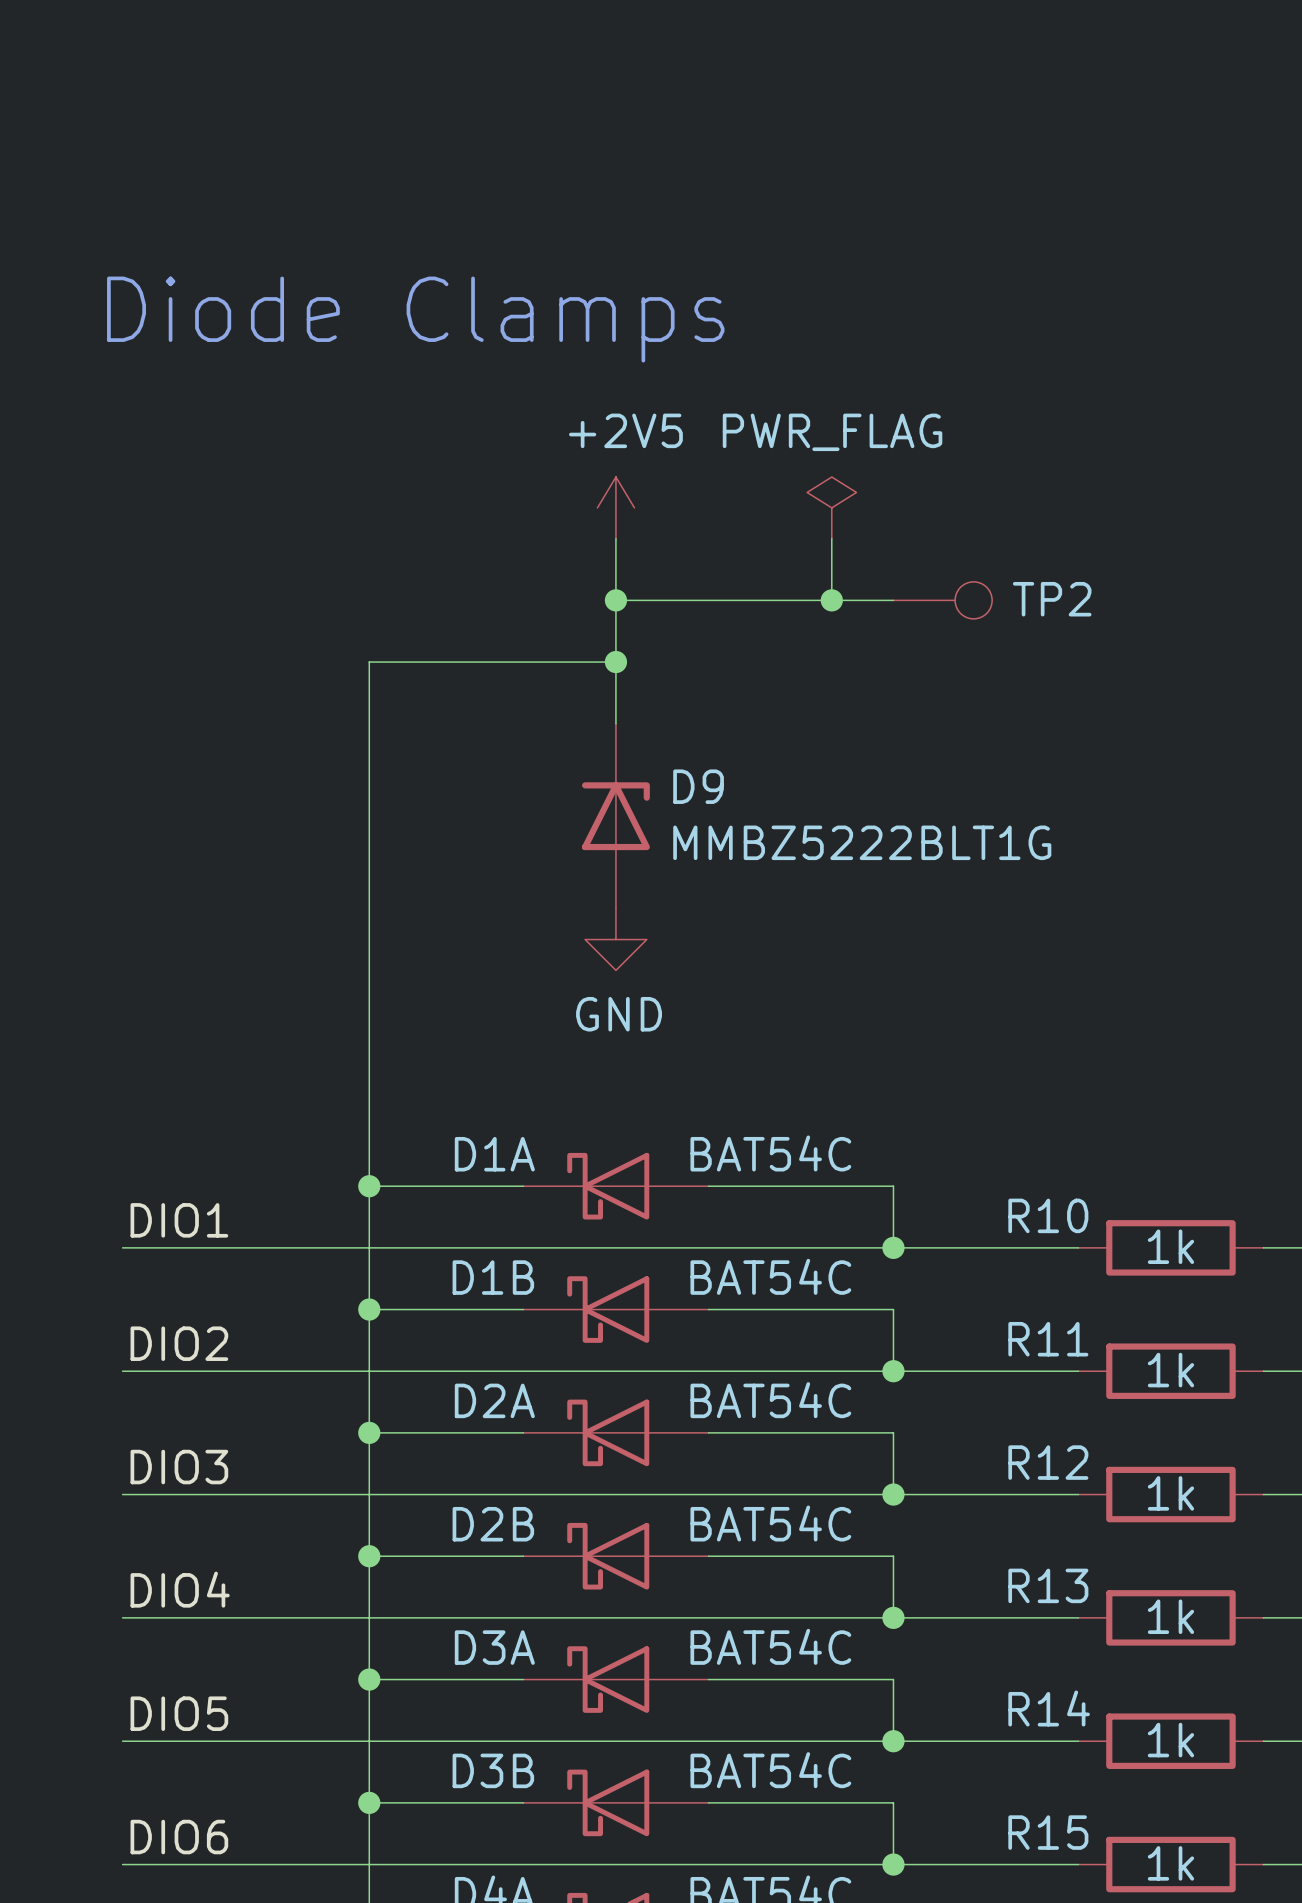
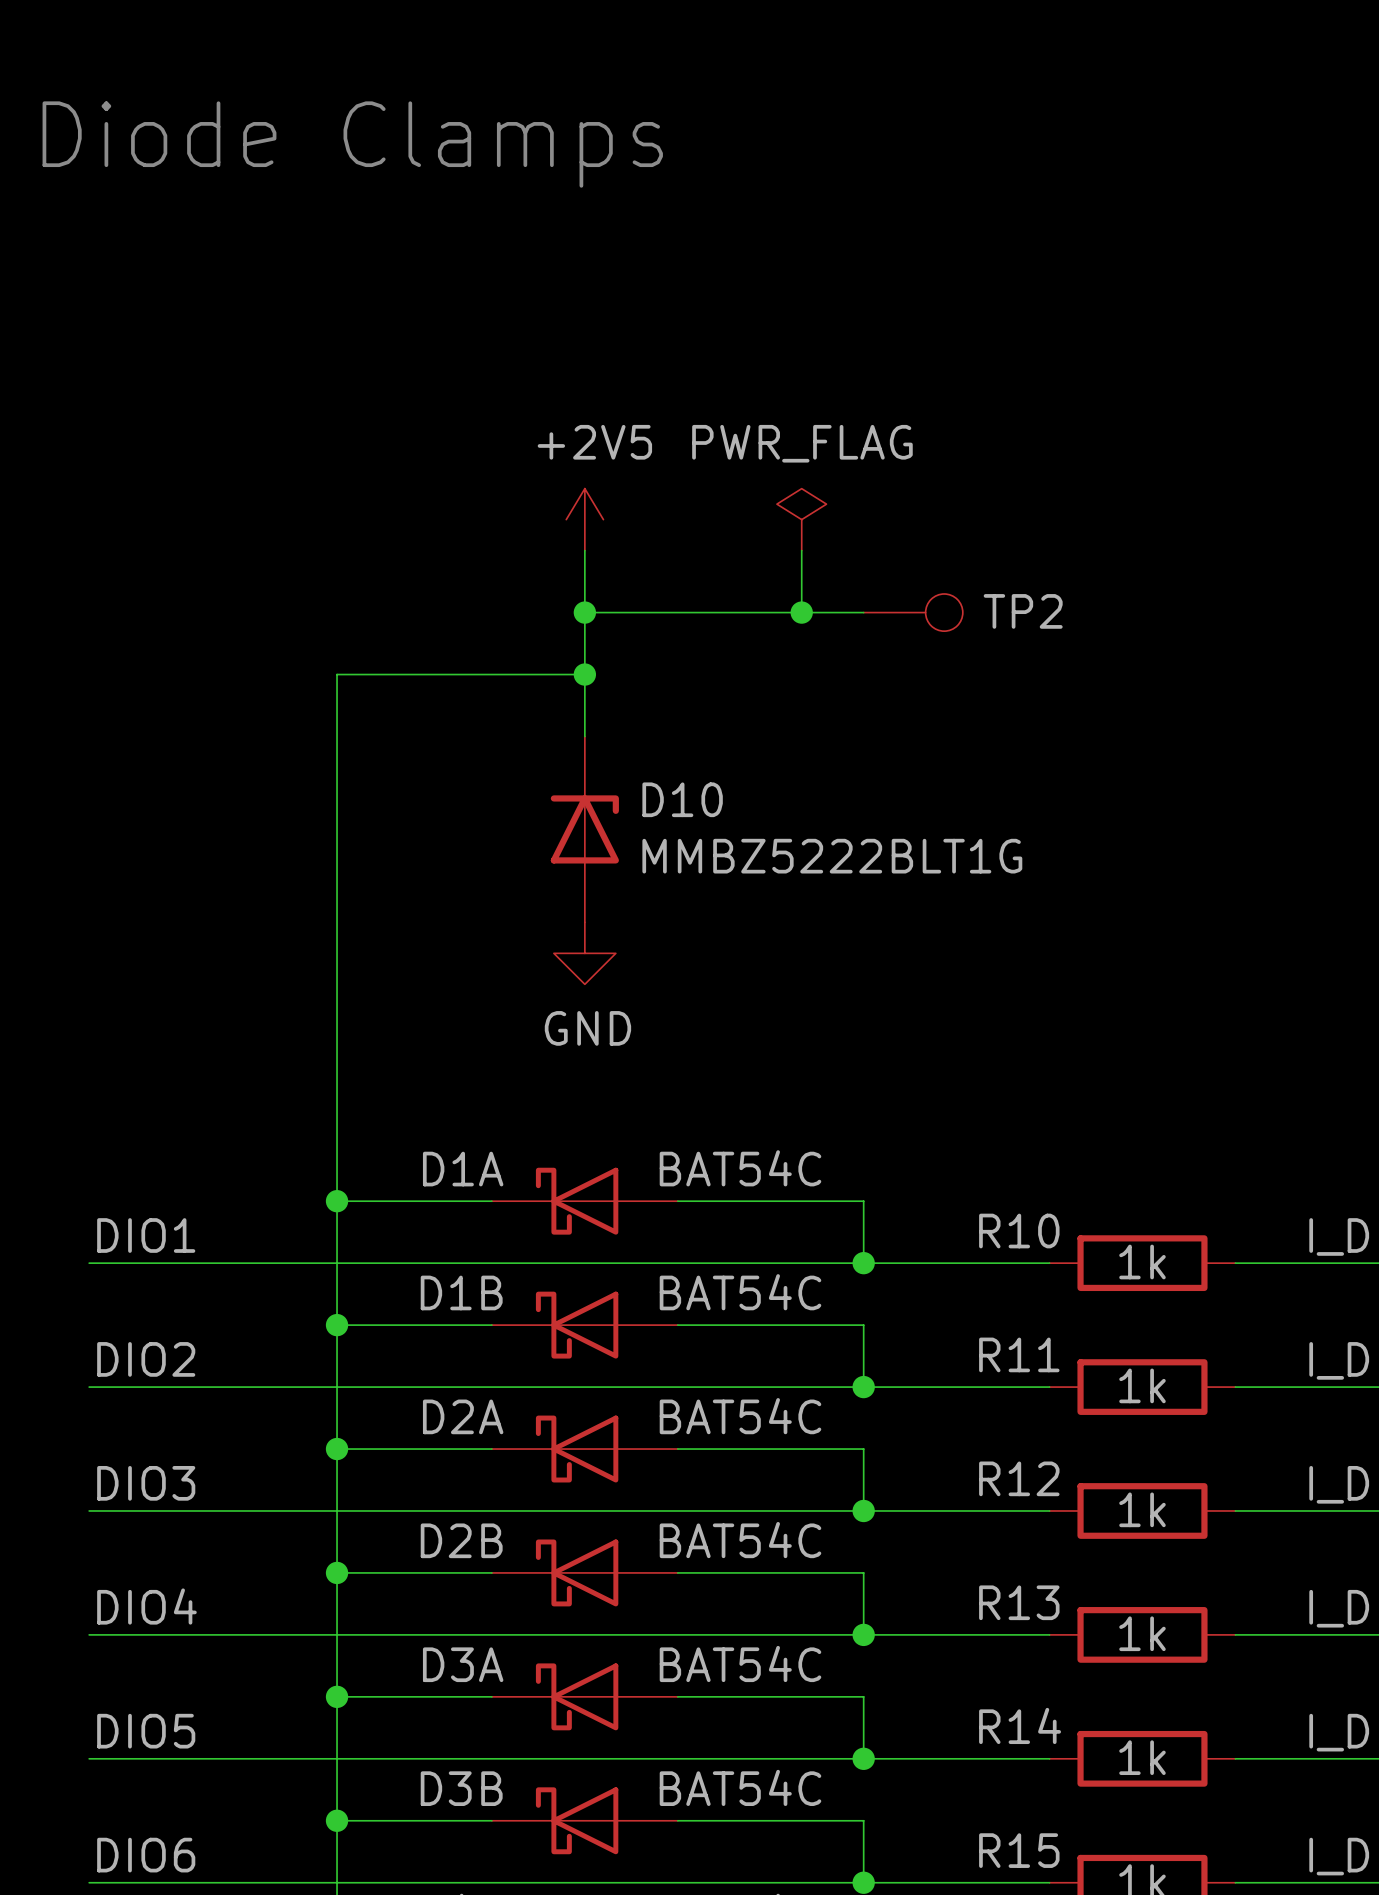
text position: Diode Clamps (415, 319) -> Diode Clamps (352, 144)
D9 name: D9 (698, 786) -> D10 (682, 799)

